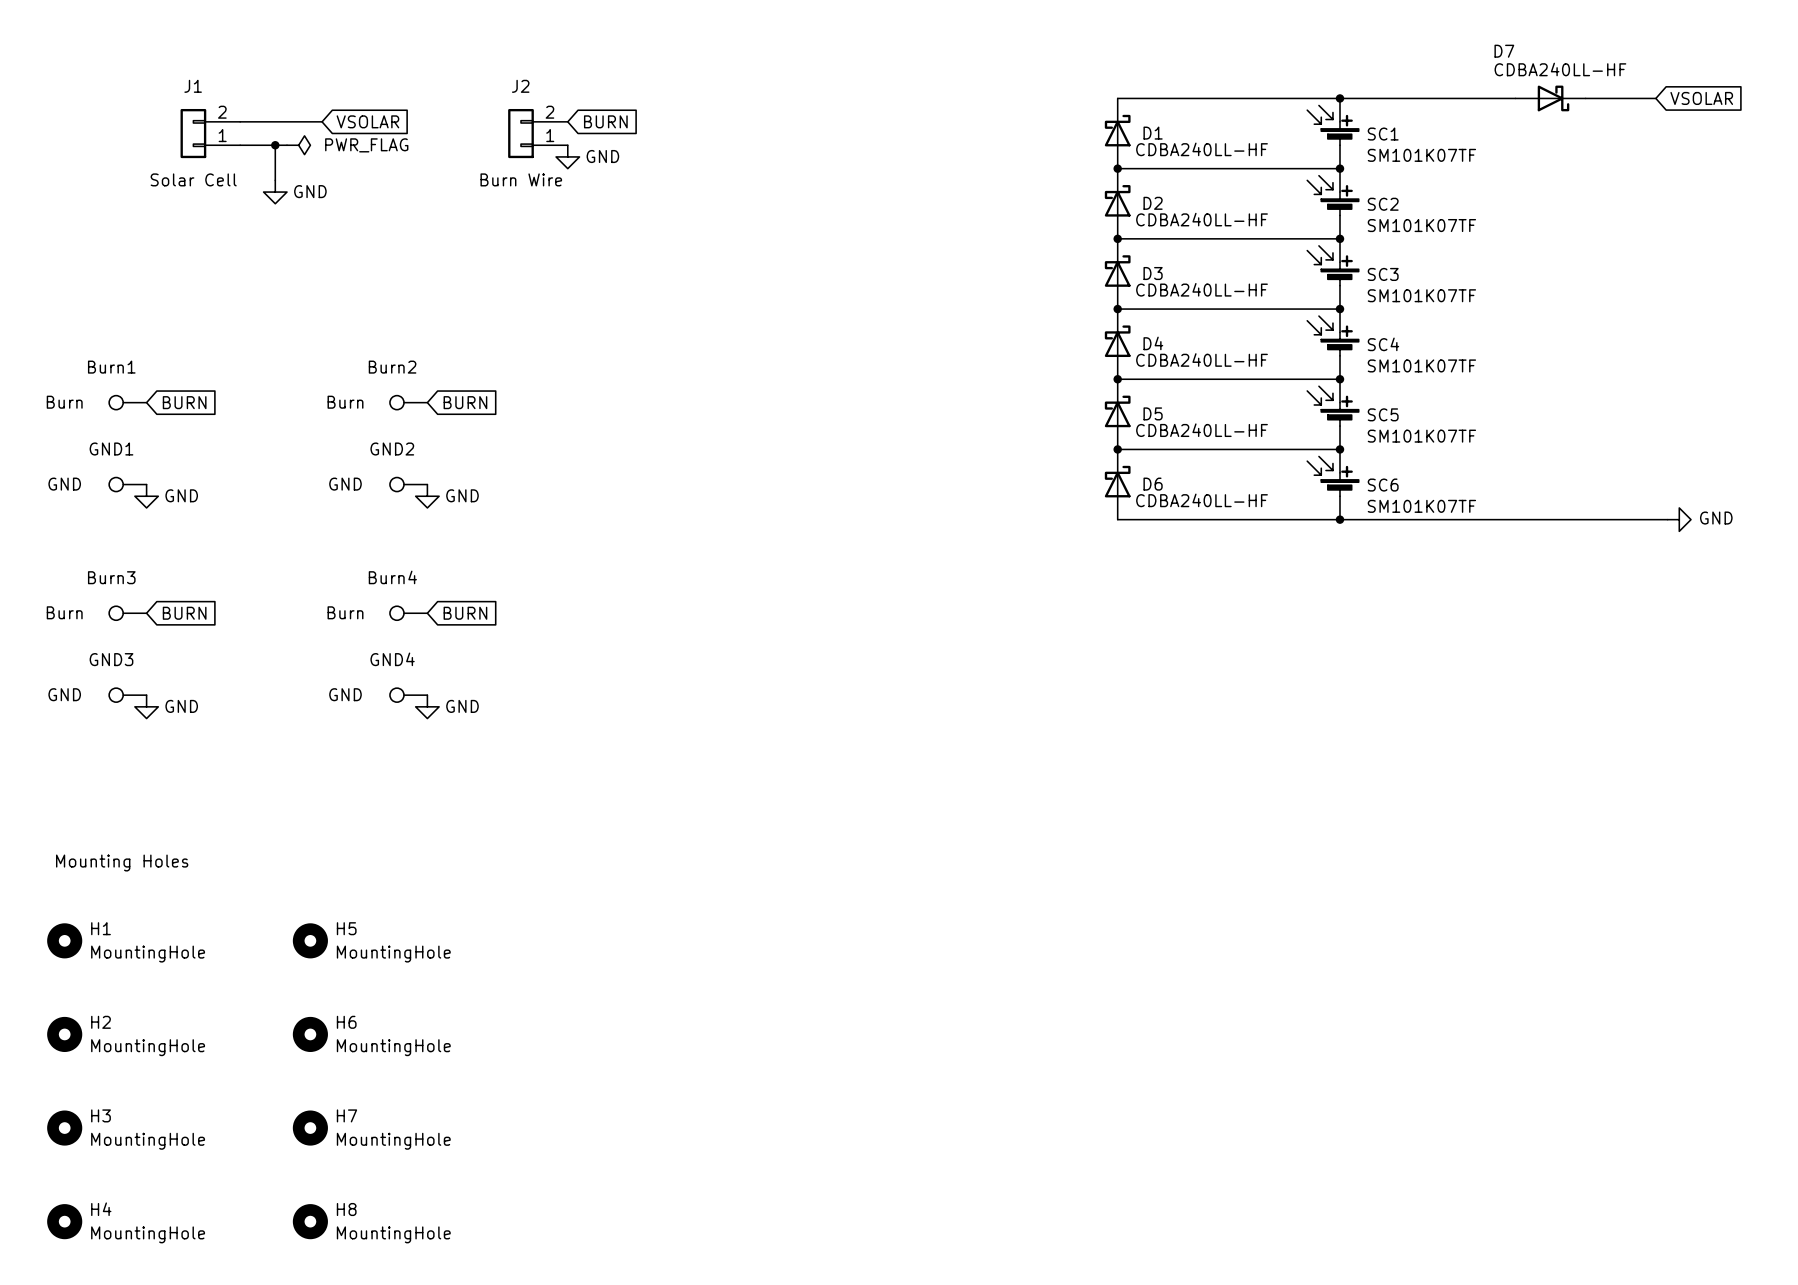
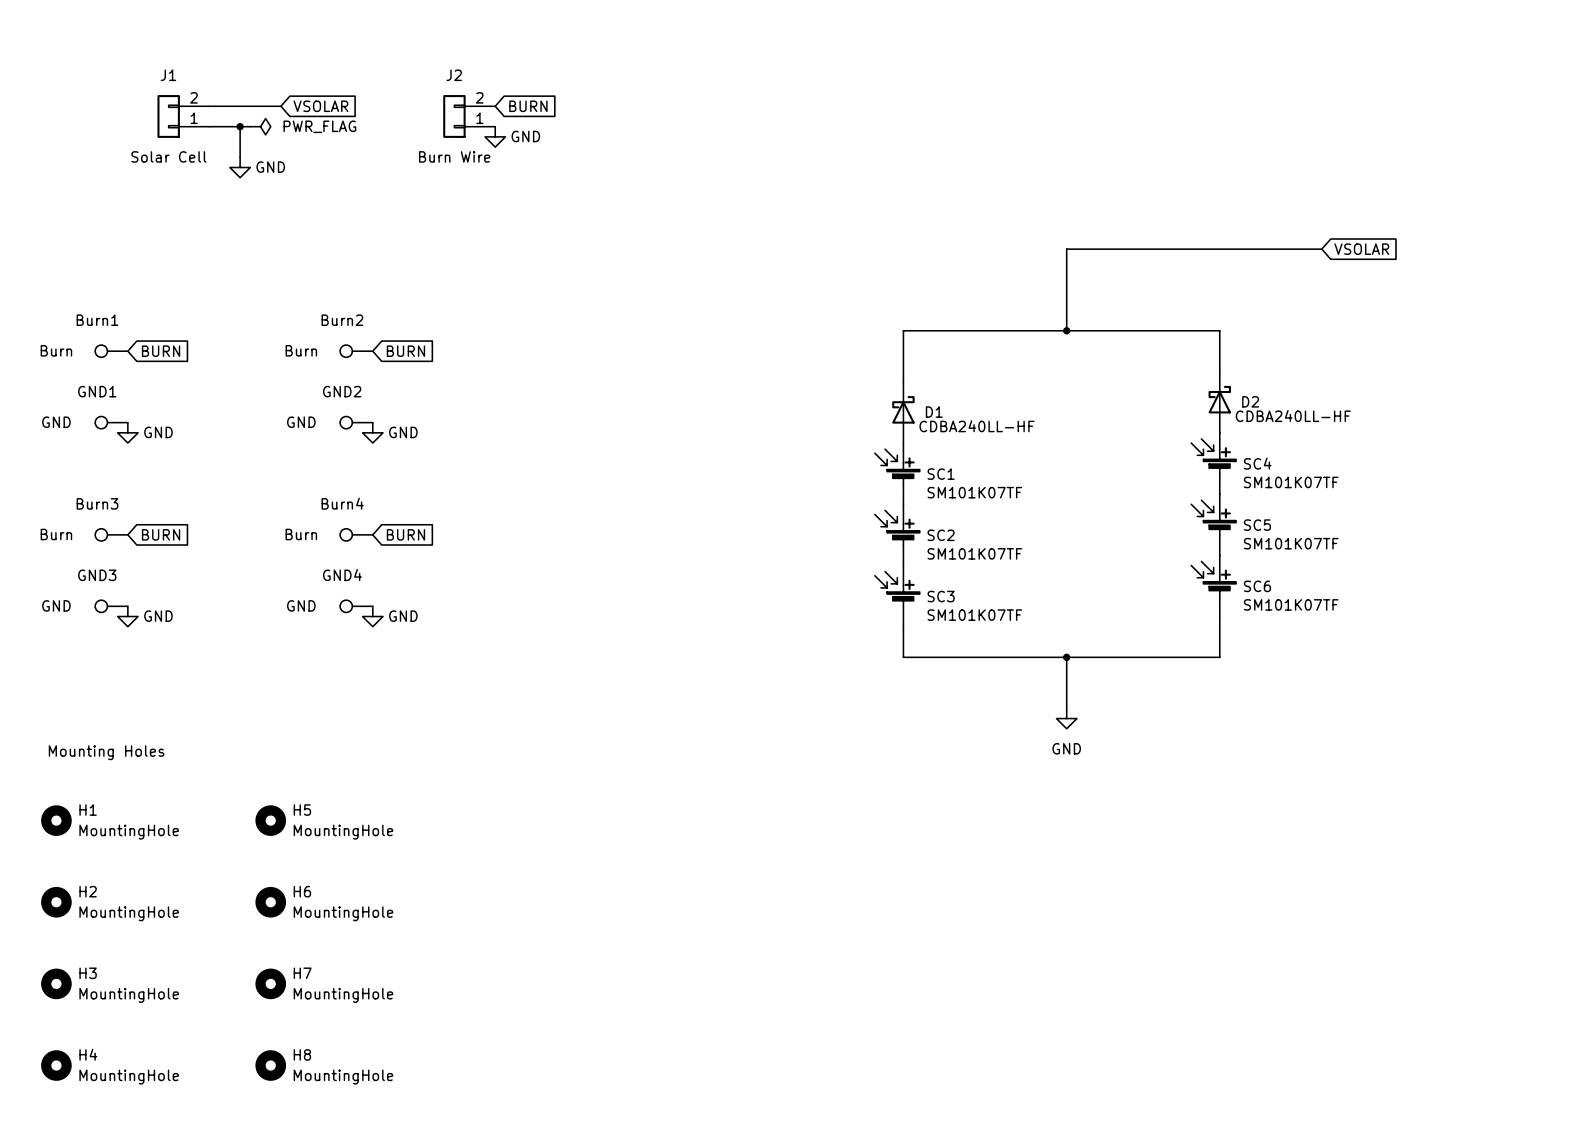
wire: (1117, 98) (1515, 98) -> none
junction: (1339, 98) -> none
D7: CDBA240LL-HF (1550, 98) -> none
wire: (1585, 98) (1655, 98) -> none
global label: VSOLAR (1701, 98) -> none
D1 position: (1117, 133) -> (903, 412)
SC1 position: (1332, 133) -> (897, 473)
wire: (1117, 168) (1339, 168) -> none
junction: (1117, 168) -> none
junction: (1339, 168) -> none
D2 position: (1117, 203) -> (1219, 402)
SC2 position: (1332, 203) -> (897, 534)
wire: (1117, 238) (1339, 238) -> none
junction: (1117, 238) -> none
junction: (1339, 238) -> none
D3: CDBA240LL-HF (1117, 273) -> none
SC3 position: (1332, 273) -> (897, 596)
wire: none -> (1321, 249) (1066, 249) (1066, 330)
global label: none -> VSOLAR (1361, 249)
wire: (1117, 309) (1339, 309) -> none
junction: (1117, 309) -> none
junction: (1339, 309) -> none
D4: CDBA240LL-HF (1117, 344) -> none
SC4 position: (1332, 344) -> (1213, 463)
wire: none -> (974, 330) (903, 330) (903, 381)
junction: (1117, 379) -> none
junction: none -> (1066, 330)
wire: none -> (1168, 330) (1219, 330) (1219, 371)
junction: (1339, 379) -> none
D5: CDBA240LL-HF (1117, 414) -> none
SC5 position: (1332, 414) -> (1213, 524)
wire: (1117, 449) (1339, 449) -> none
junction: (1117, 449) -> none
junction: (1339, 449) -> none
D6: CDBA240LL-HF (1117, 484) -> none
SC6 position: (1332, 484) -> (1213, 585)
wire: (1117, 519) (1667, 519) -> none
junction: (1339, 519) -> none
power symbol: GND (1679, 519) -> none
wire: none -> (1219, 616) (1219, 657) (903, 657) (903, 626)
wire: none -> (1066, 657) (1066, 708)
junction: none -> (1066, 657)
power symbol: none -> GND (1066, 718)

